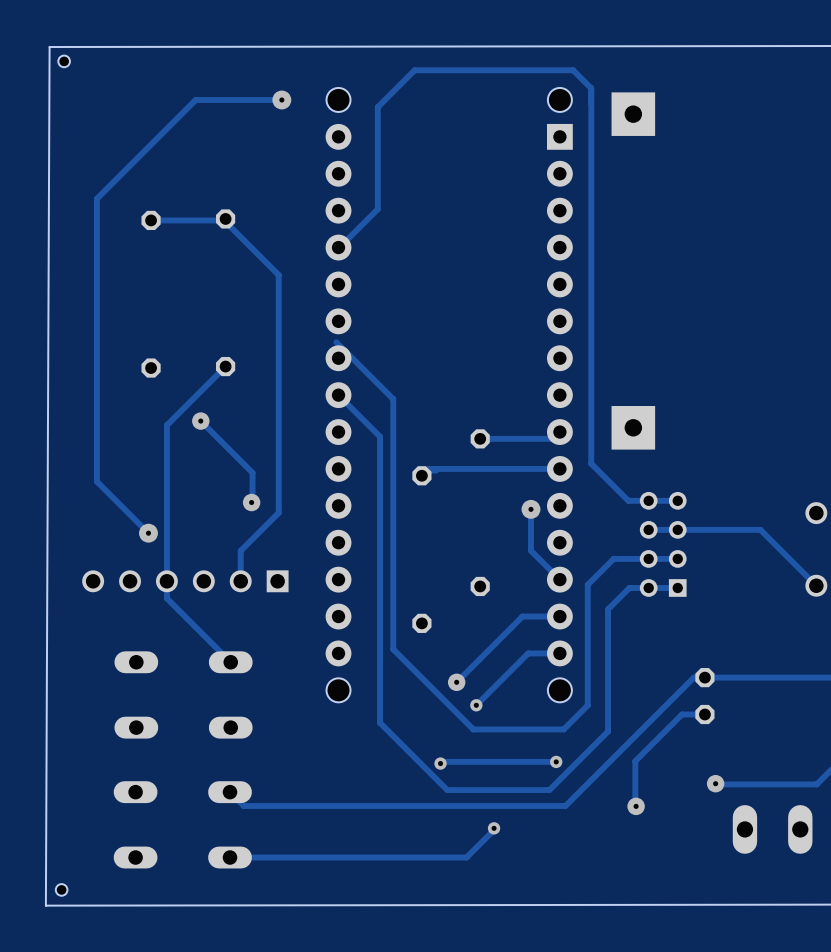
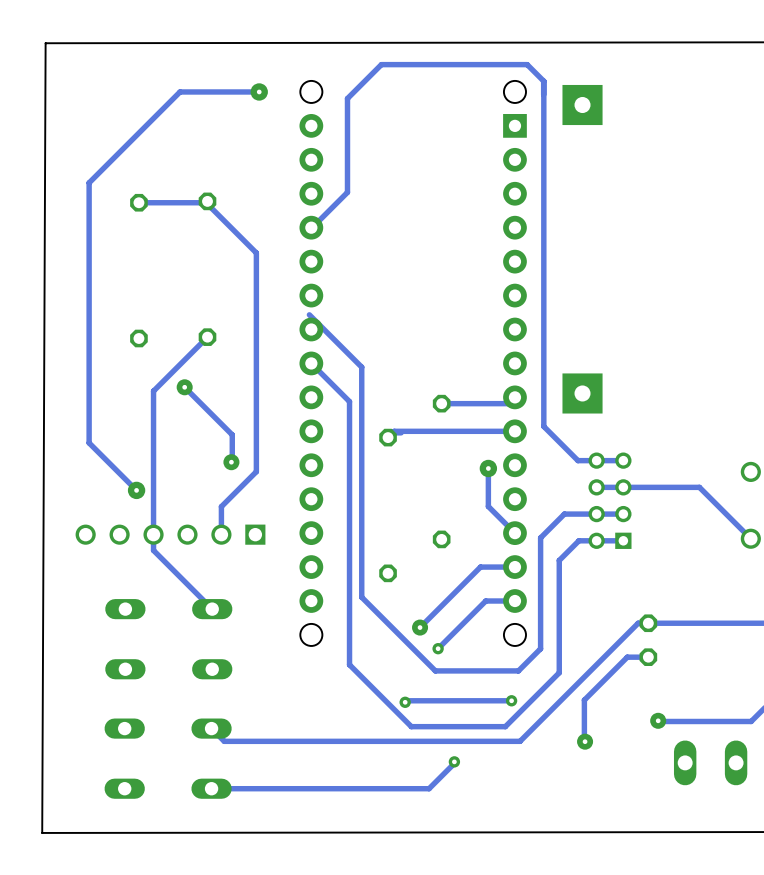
hole: (64, 61) -> none
hole: (61, 889) -> none

